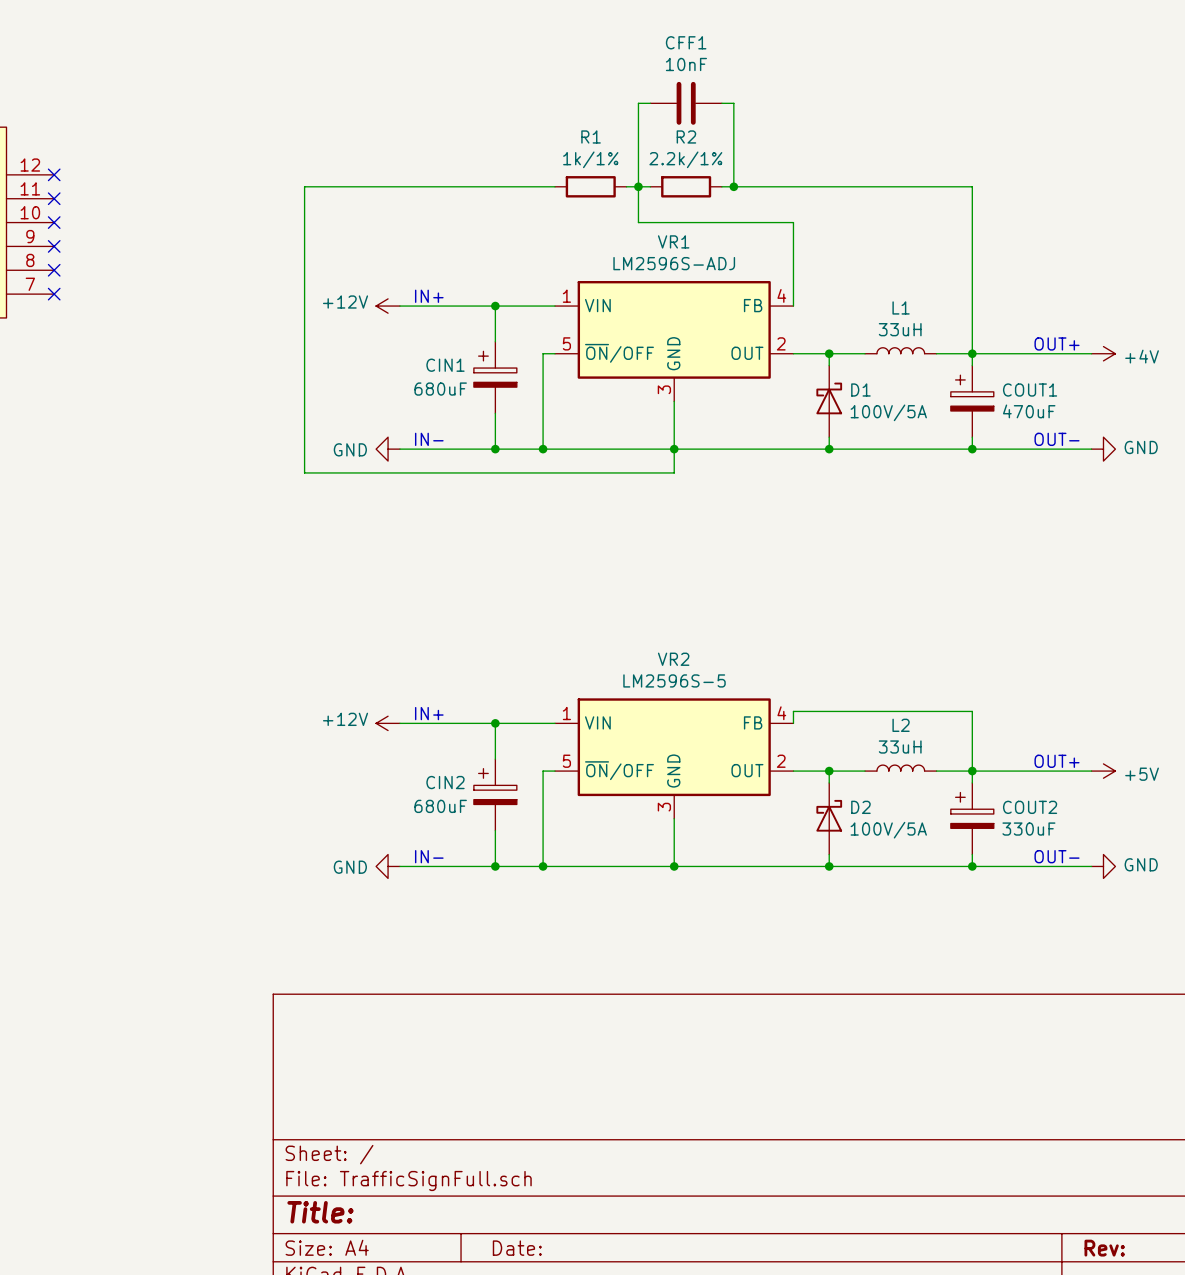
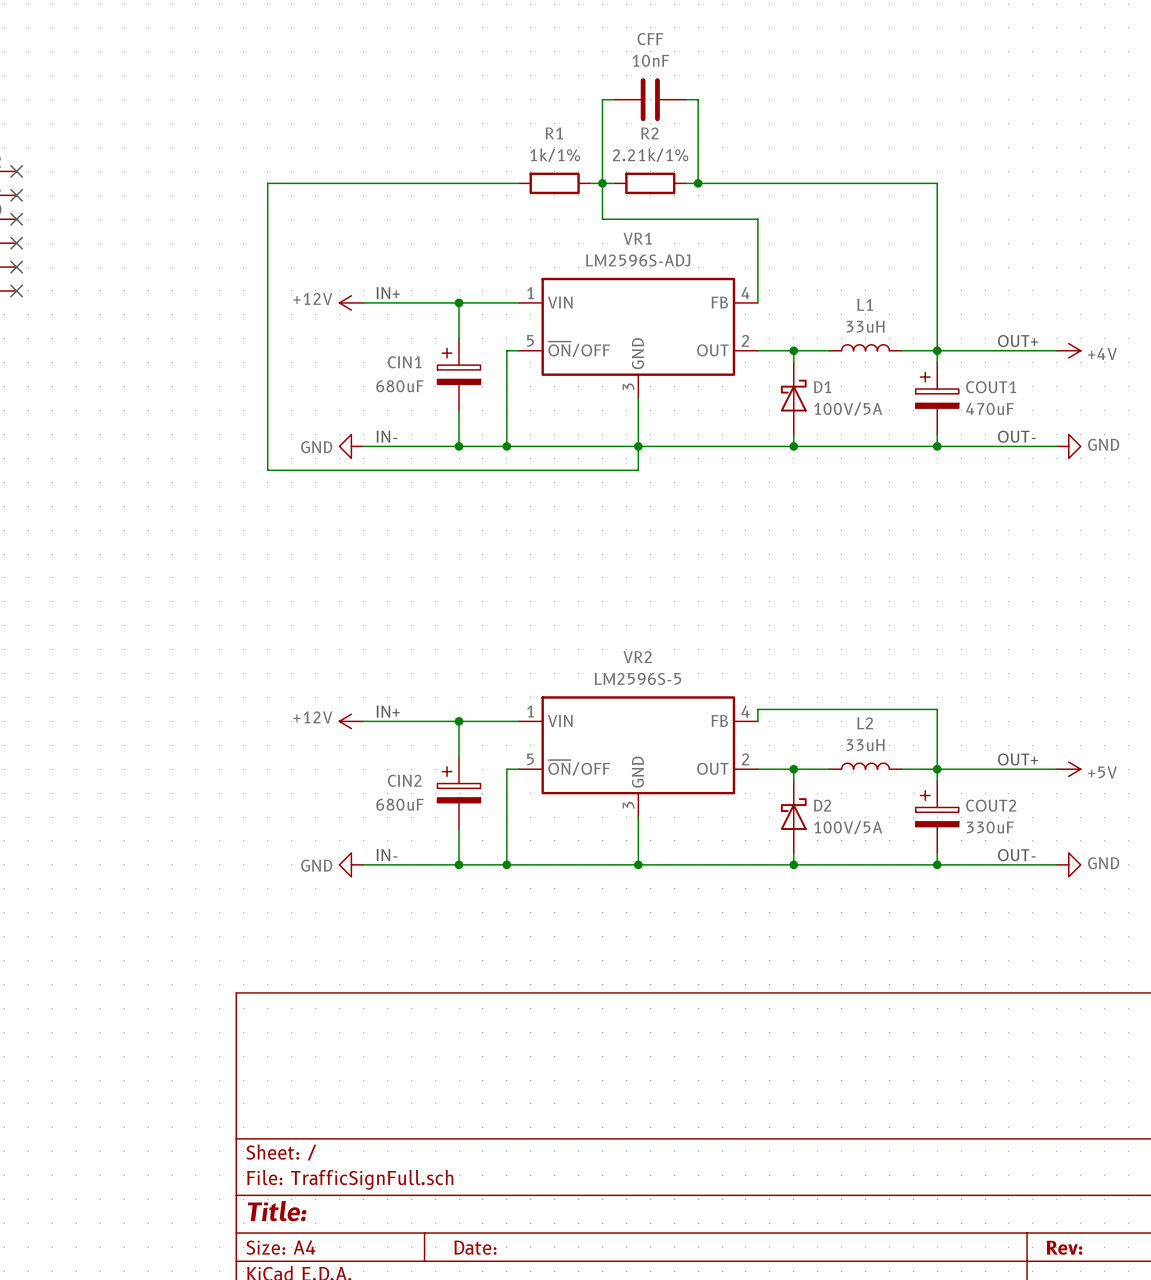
CFF1 name: CFF1 (686, 42) -> CFF (650, 39)
R2 value: 2.2k/1% (685, 159) -> 2.21k/1% (650, 155)

